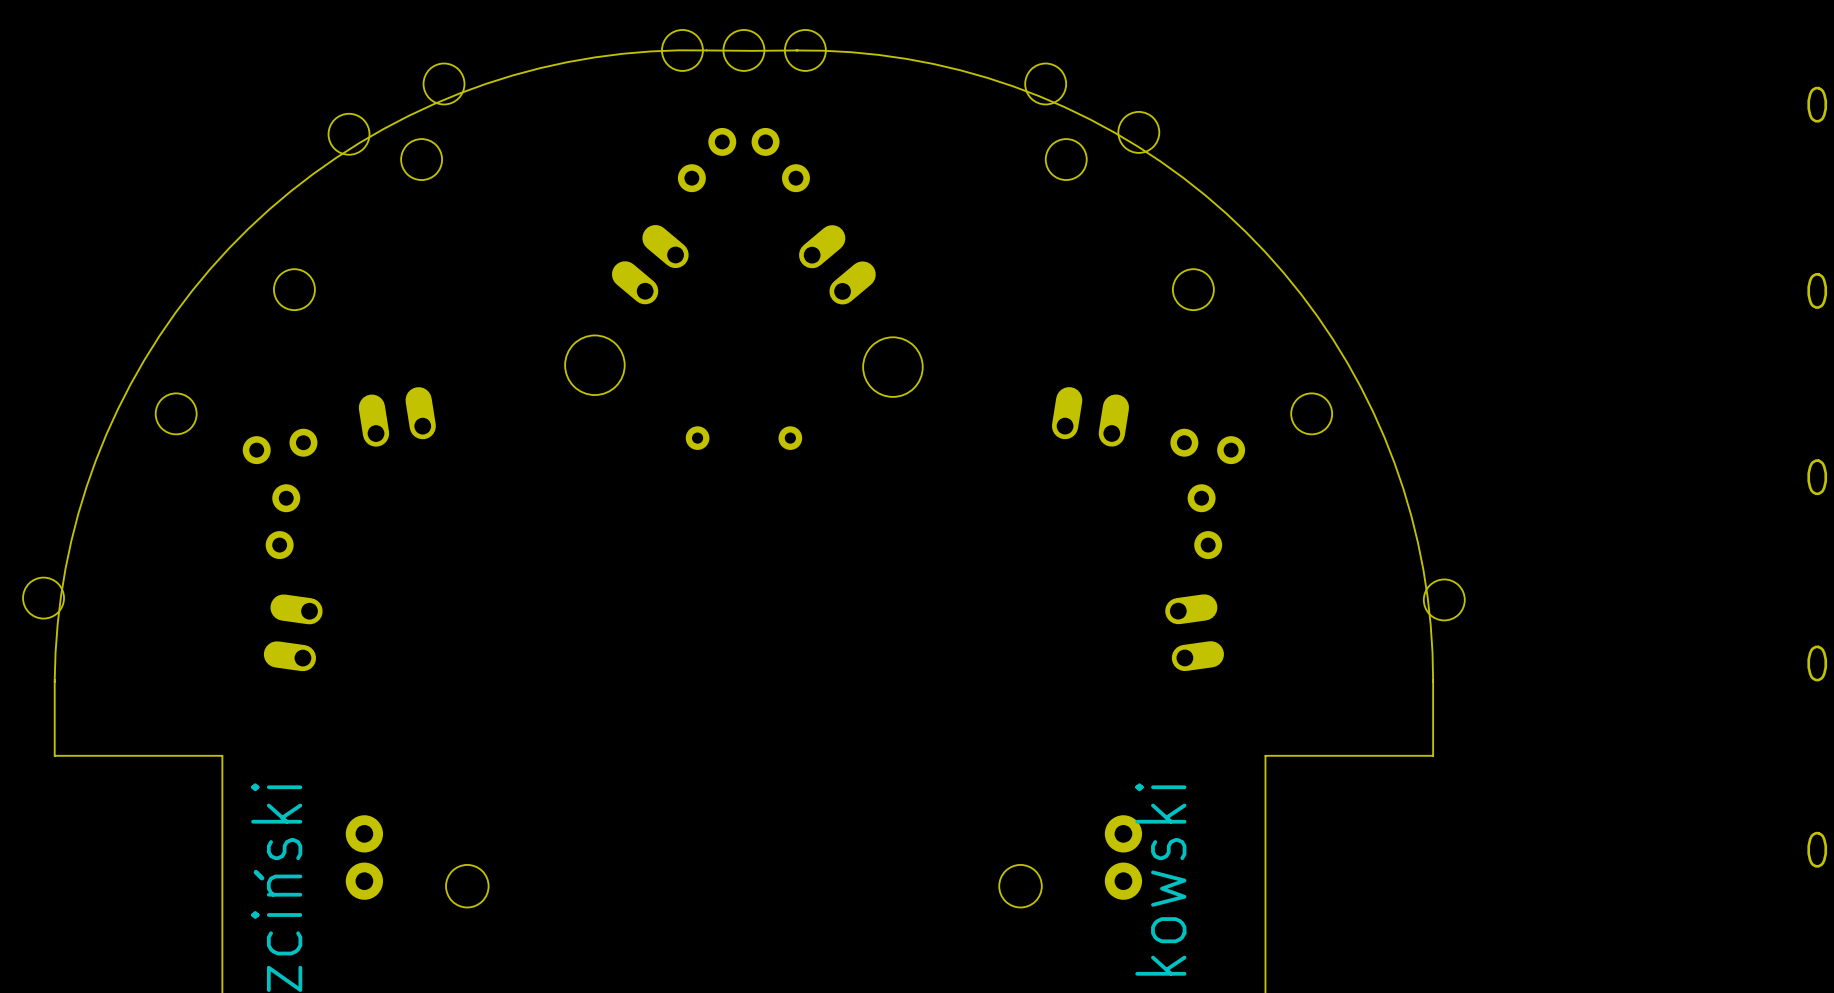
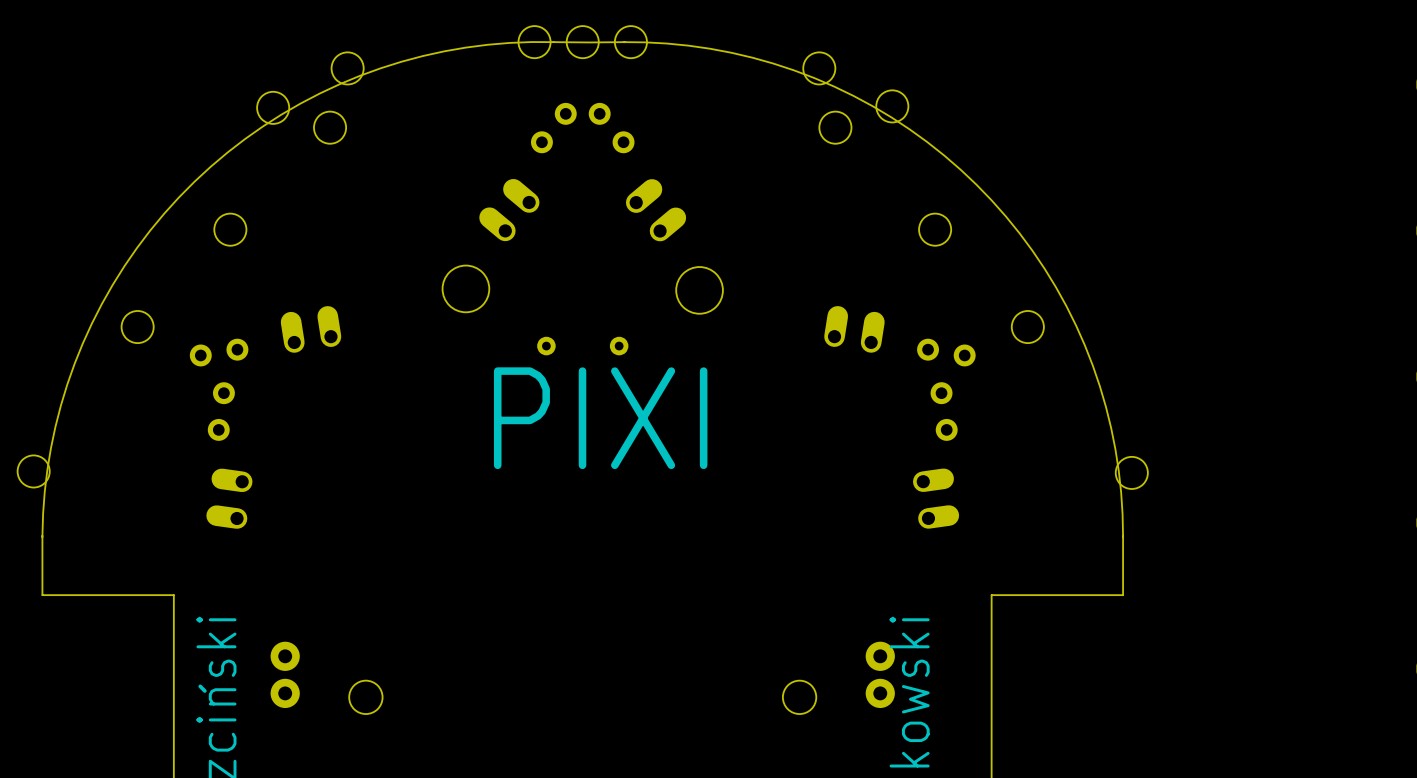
text: none -> PIXI (600, 418)

